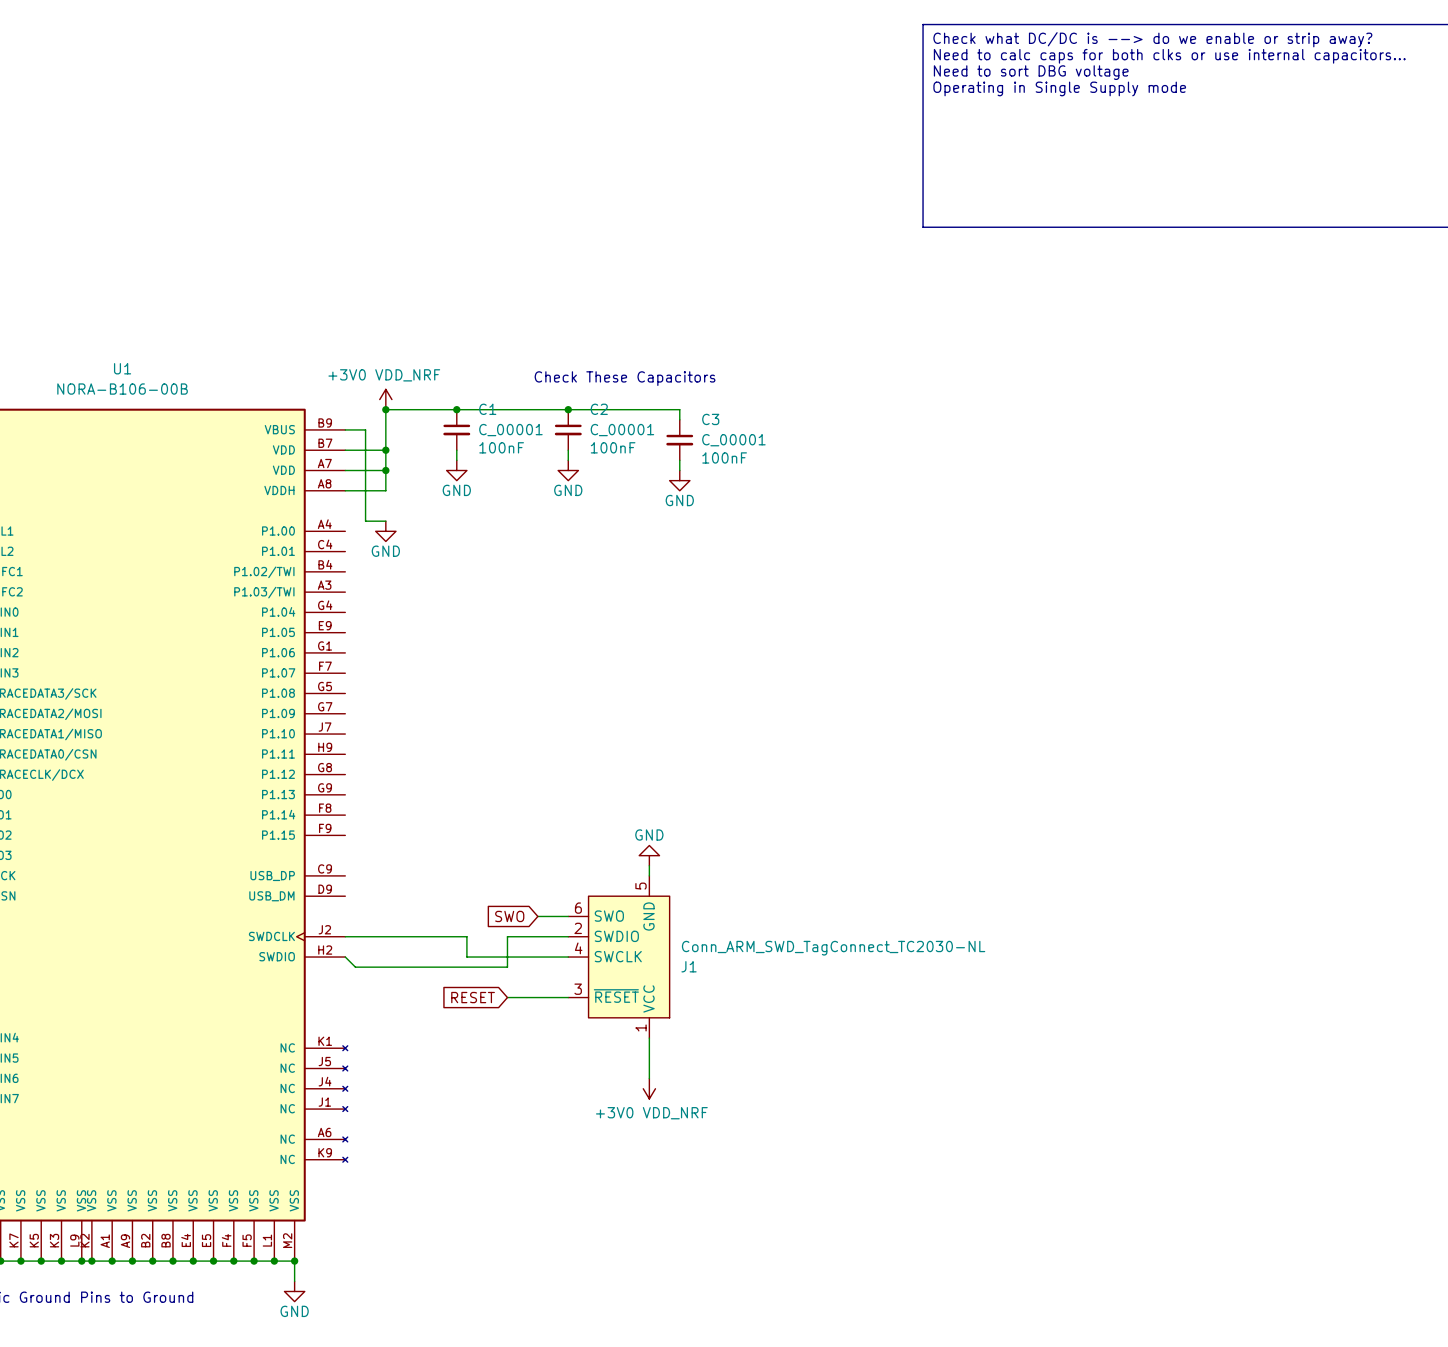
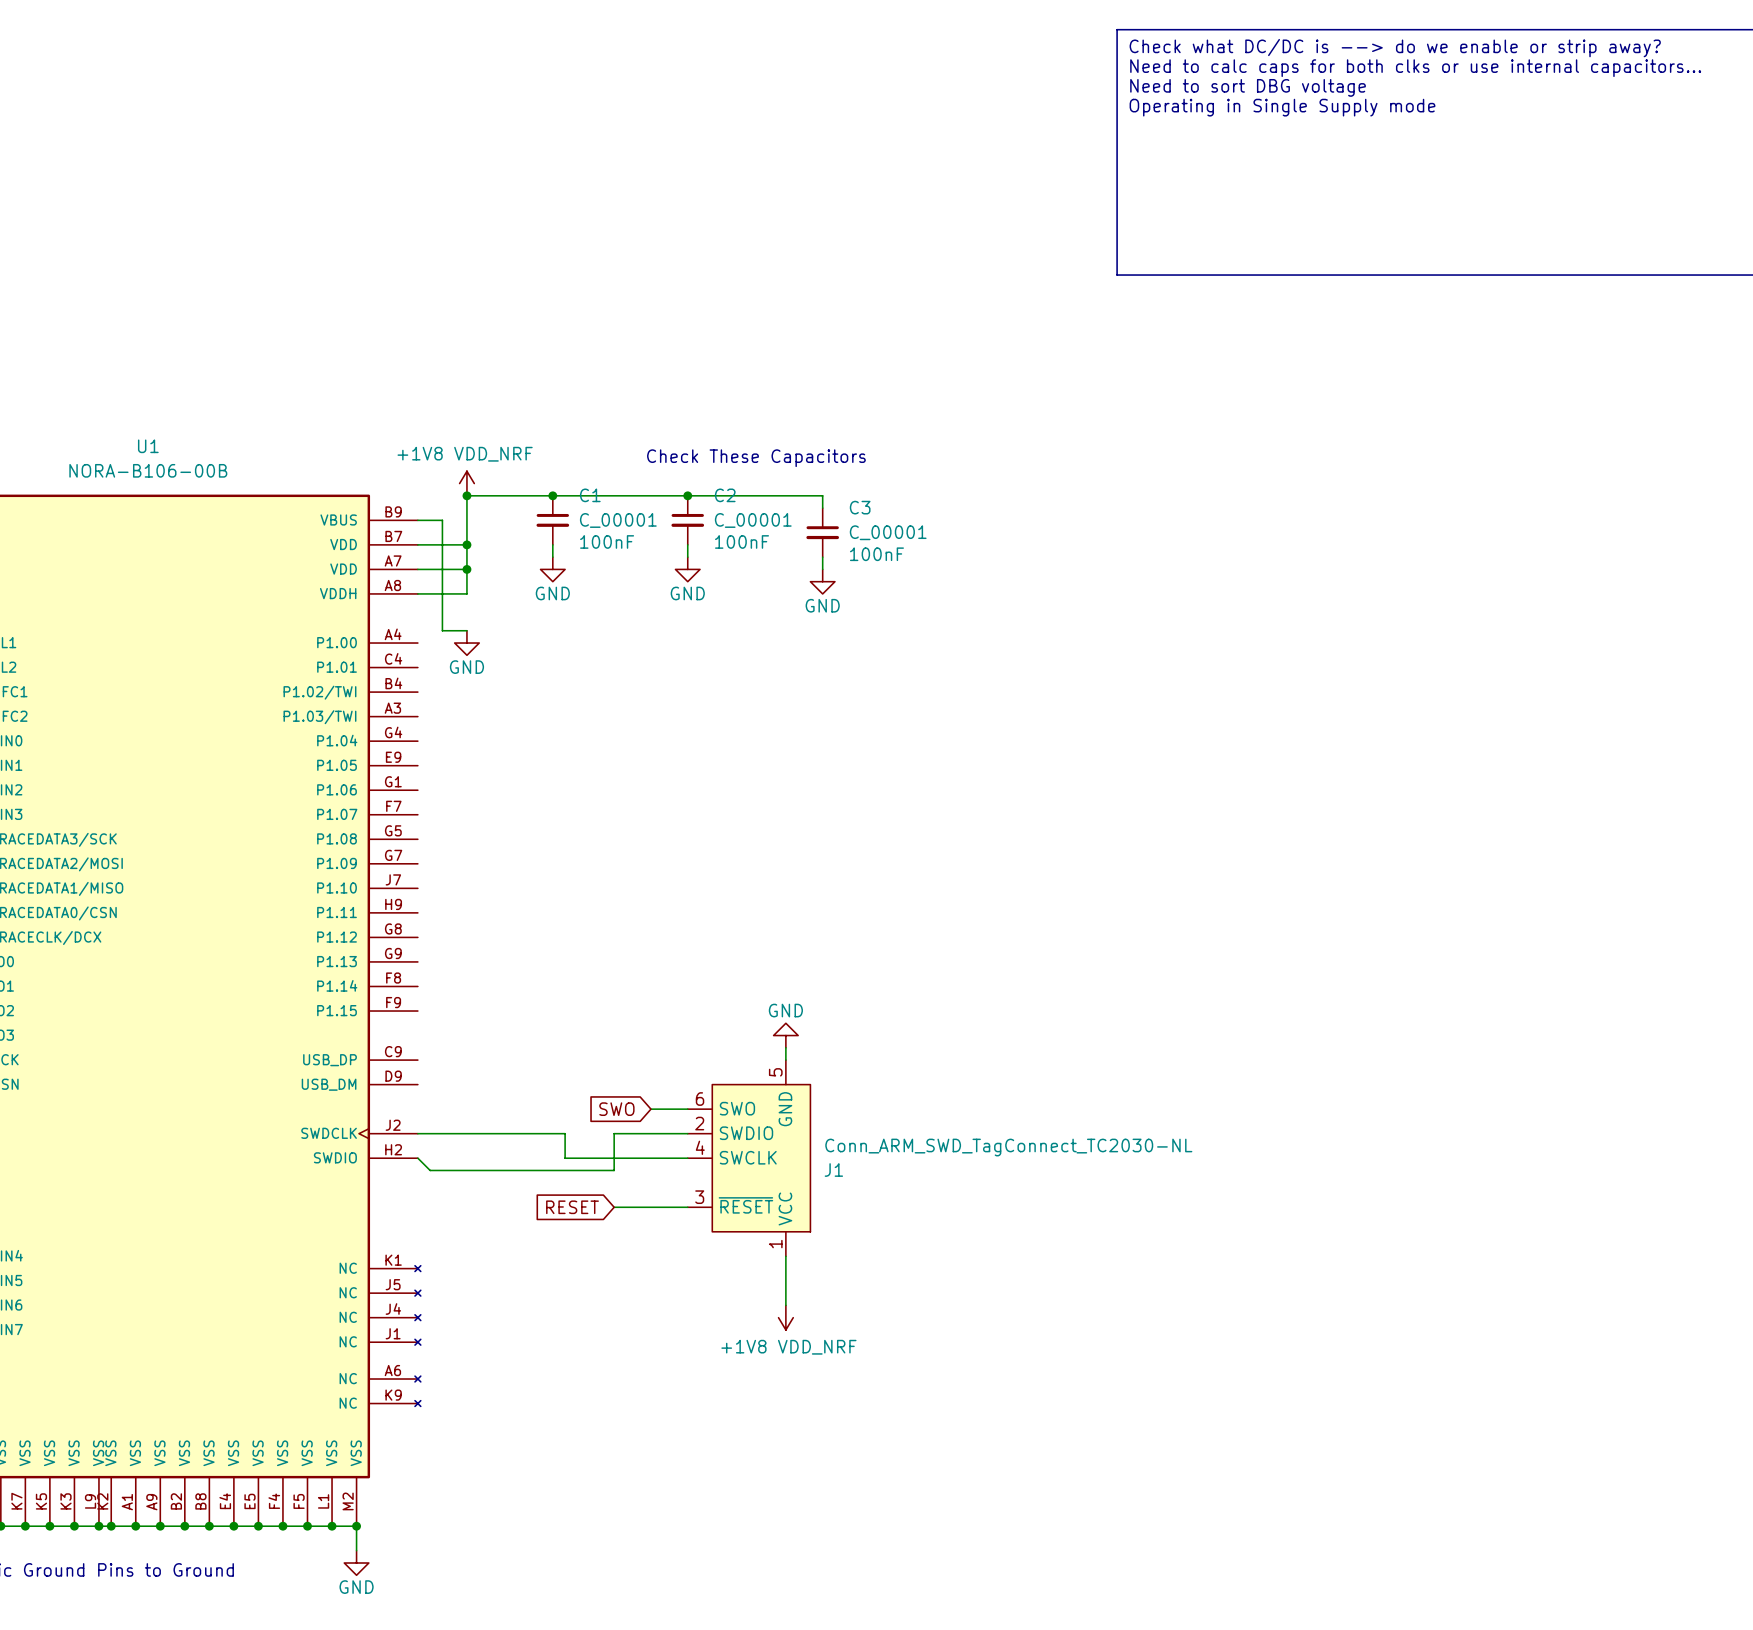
power symbol: +3V0 VDD_NRF (385, 399) -> +1V8 VDD_NRF (466, 483)
power symbol: +3V0 VDD_NRF (649, 1088) -> +1V8 VDD_NRF (785, 1317)

